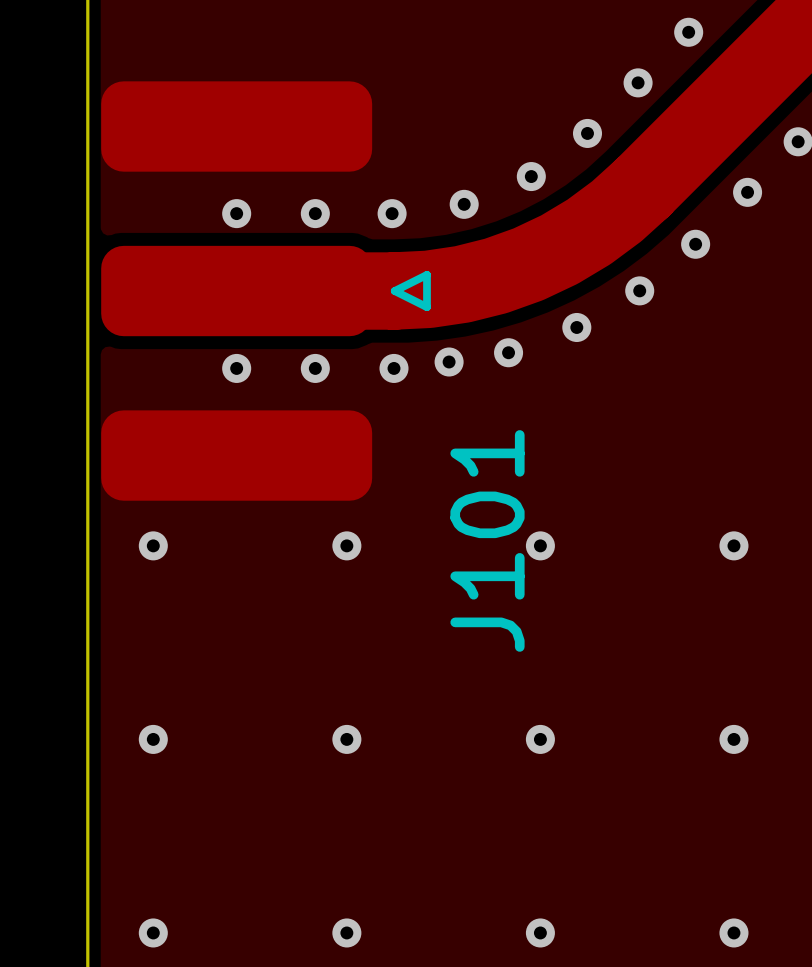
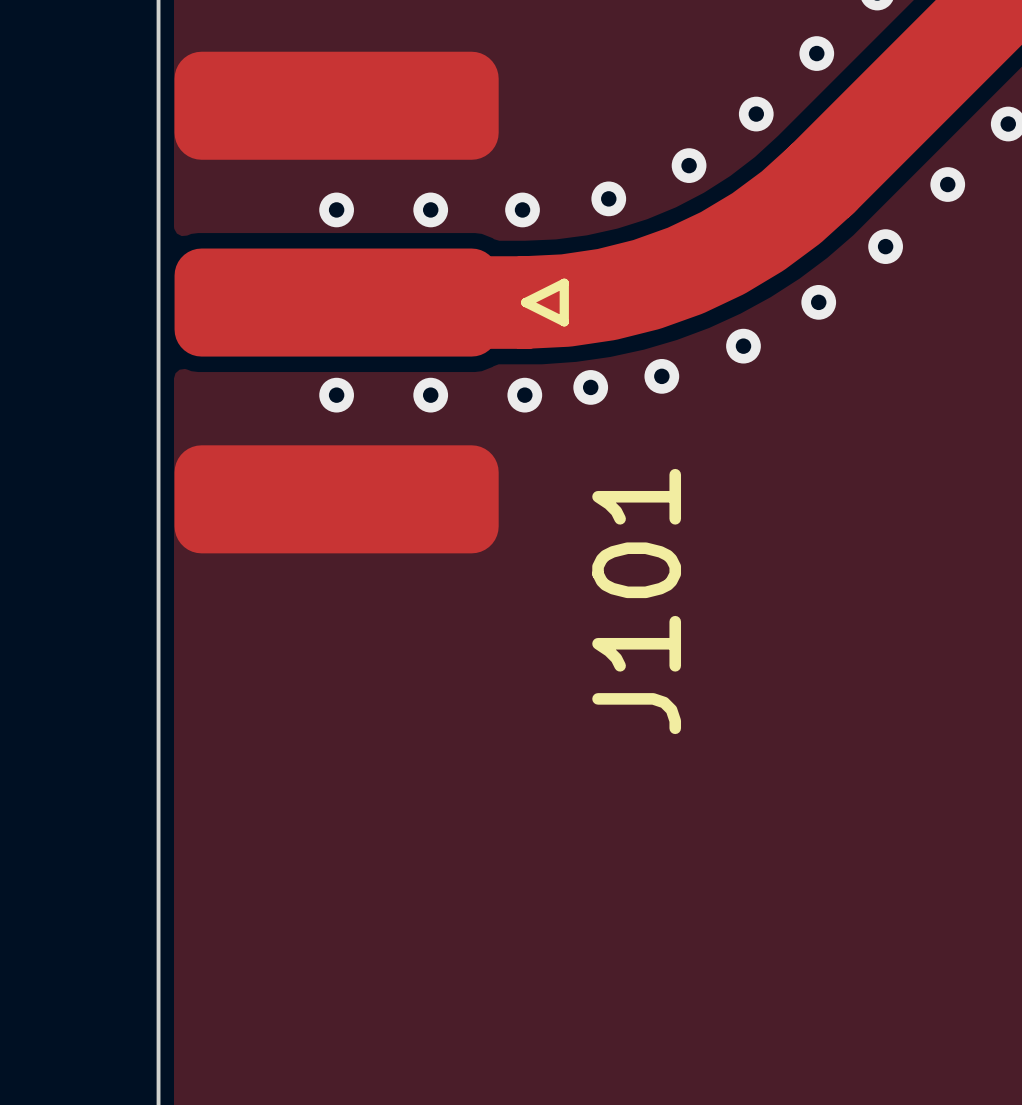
via: (153, 545) -> none
via: (346, 545) -> none
via: (540, 545) -> none
via: (733, 545) -> none
via: (153, 739) -> none
via: (346, 739) -> none
via: (540, 739) -> none
via: (733, 739) -> none
via: (153, 932) -> none
via: (346, 932) -> none
via: (540, 932) -> none
via: (733, 932) -> none

